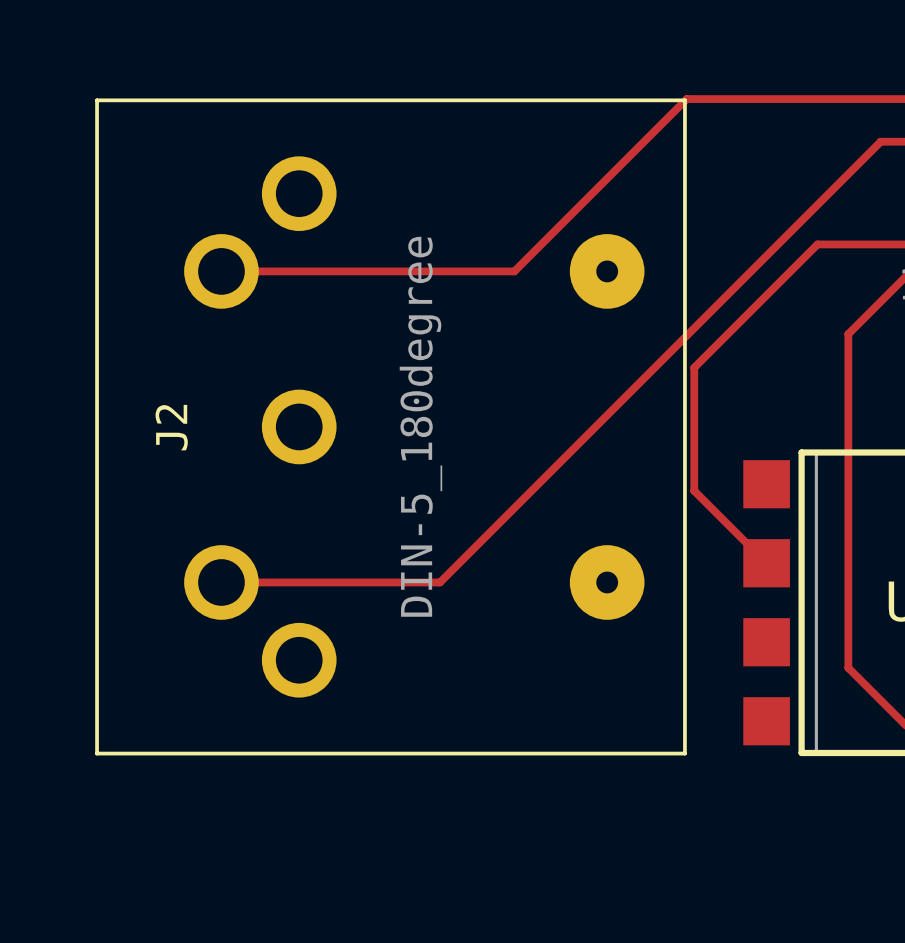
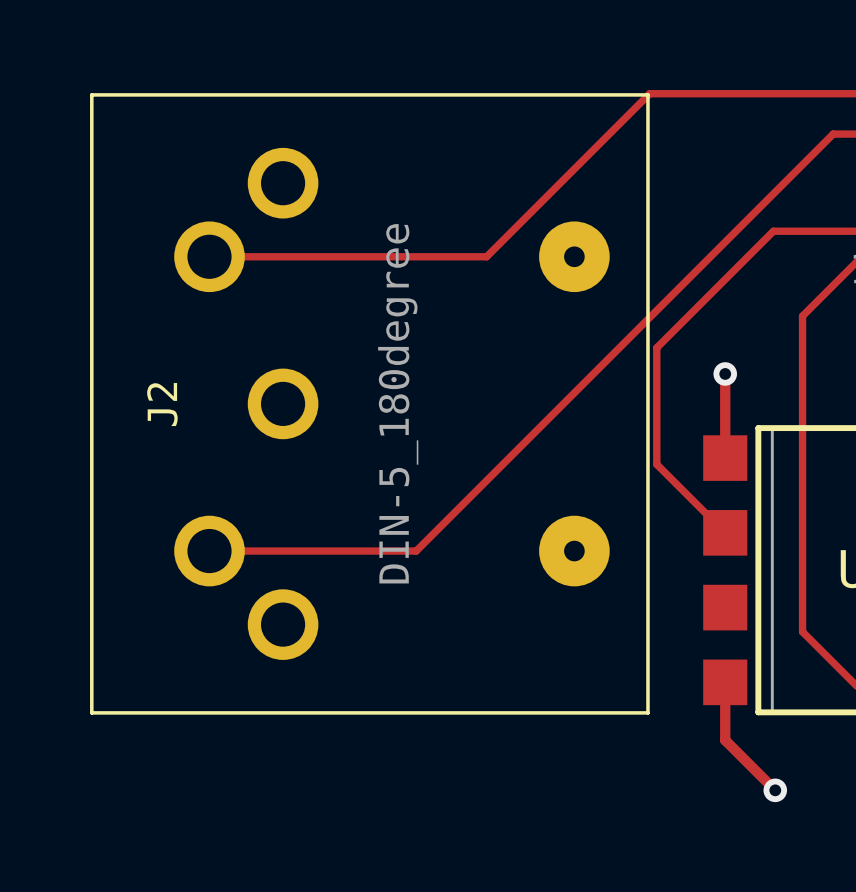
track: none -> (725, 373) (725, 458)
via: none -> (725, 373)
track: none -> (725, 682) (725, 740) (775, 790)
via: none -> (775, 790)

